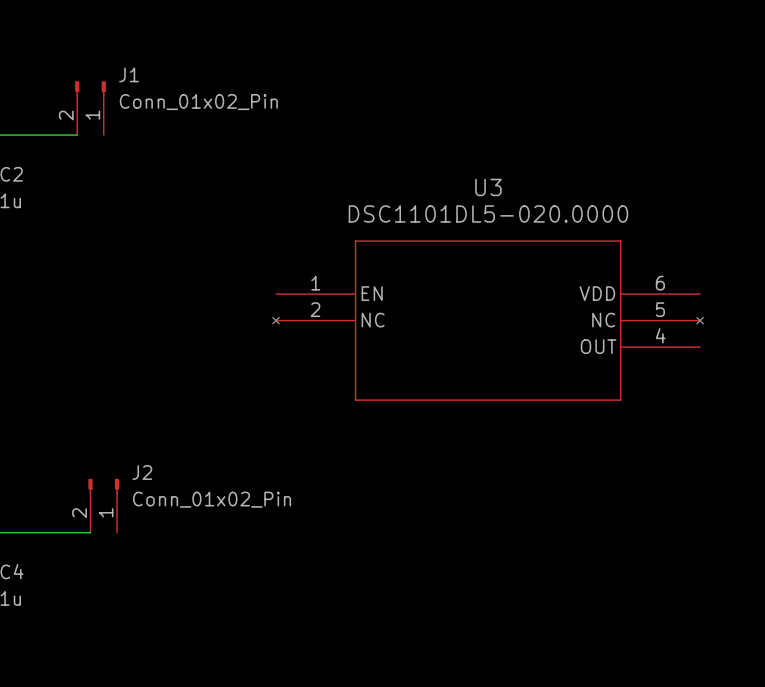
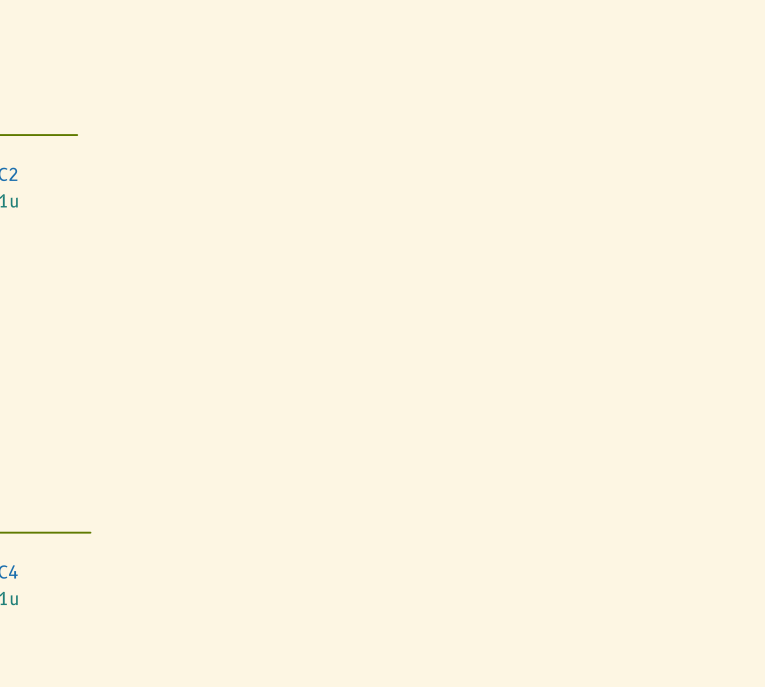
J1: Conn_01x02_Pin (90, 108) -> none
U3: DSC1101DL5-020.0000 (488, 320) -> none
J2: Conn_01x02_Pin (103, 505) -> none

